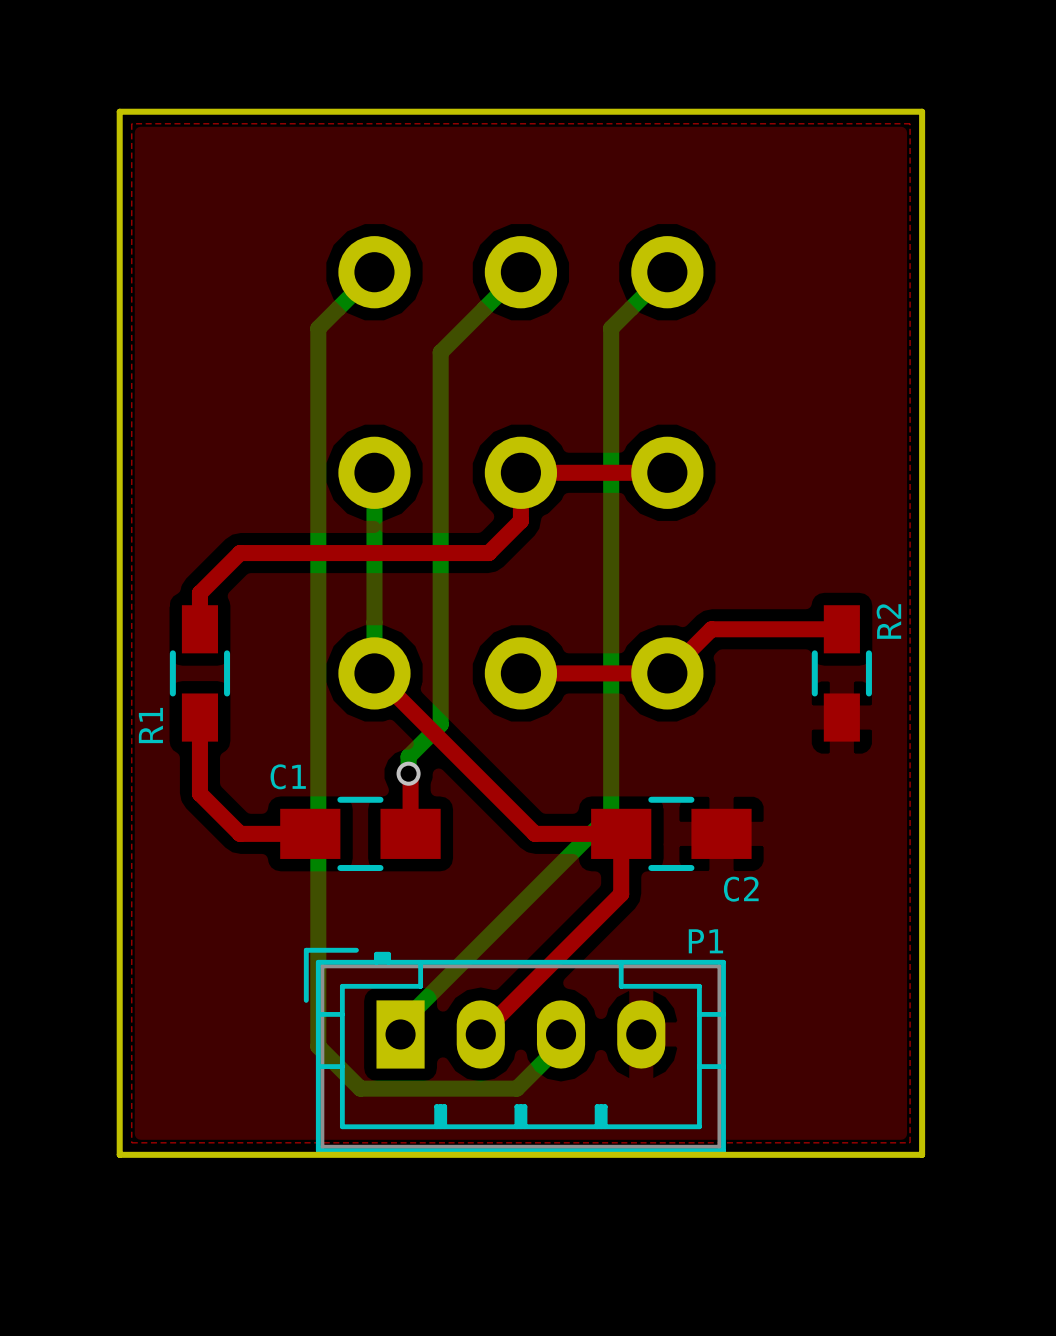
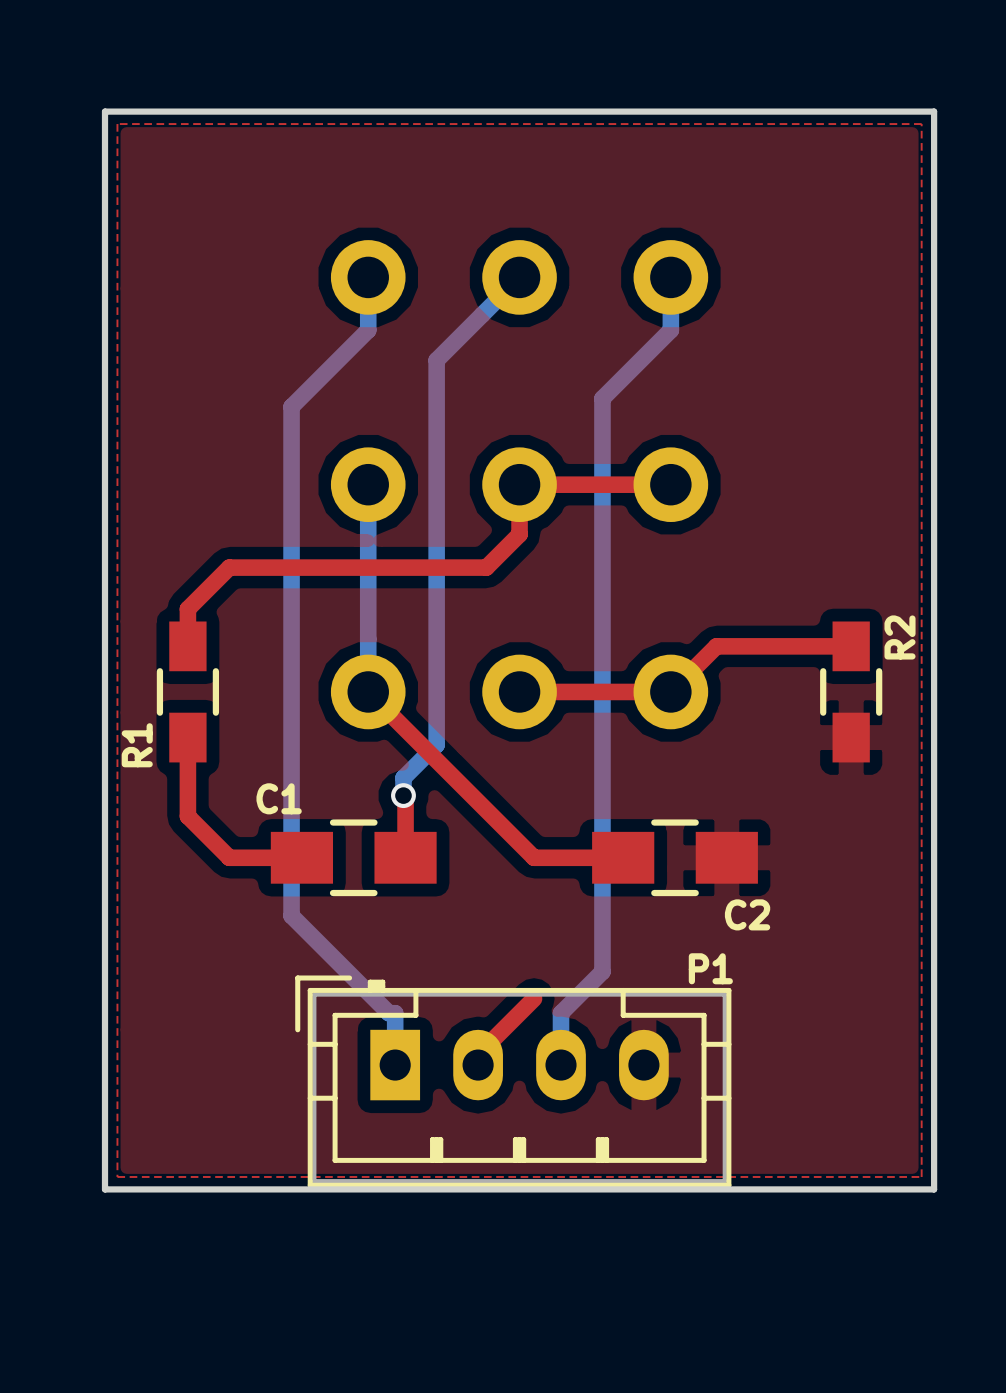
bottom track: (374, 272) (318, 328) (318, 1046) (360, 1088) (516, 1088) (561, 1044) (561, 1034) -> (368, 277) (368, 330) (291, 406) (291, 915) (388, 1013) (395, 1013) (395, 1054)
bottom track: (667, 272) (611, 328) (611, 813) (400, 1024) -> (670, 277) (670, 330) (602, 398) (602, 971) (561, 1013) (561, 1065)
top track: (621, 833) (621, 894) (480, 1034) -> (534, 998) (478, 1054) (478, 1065)

